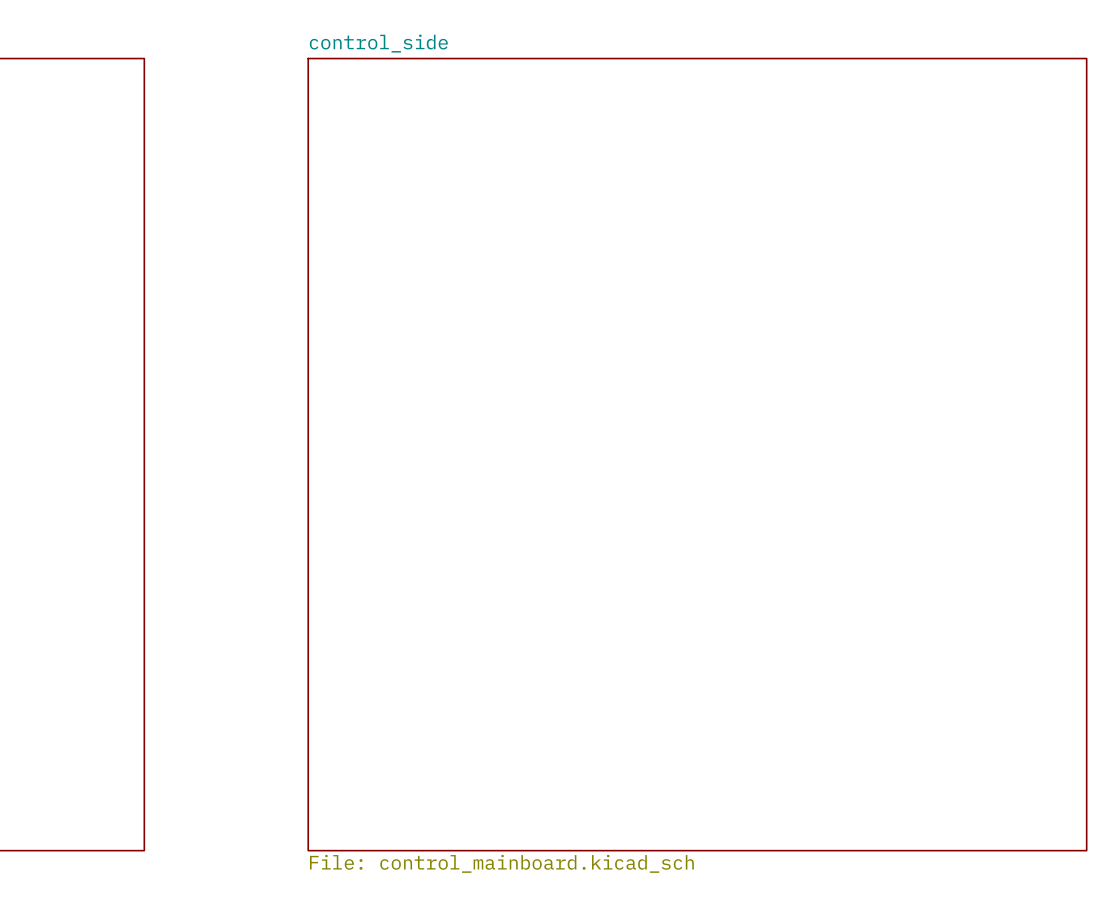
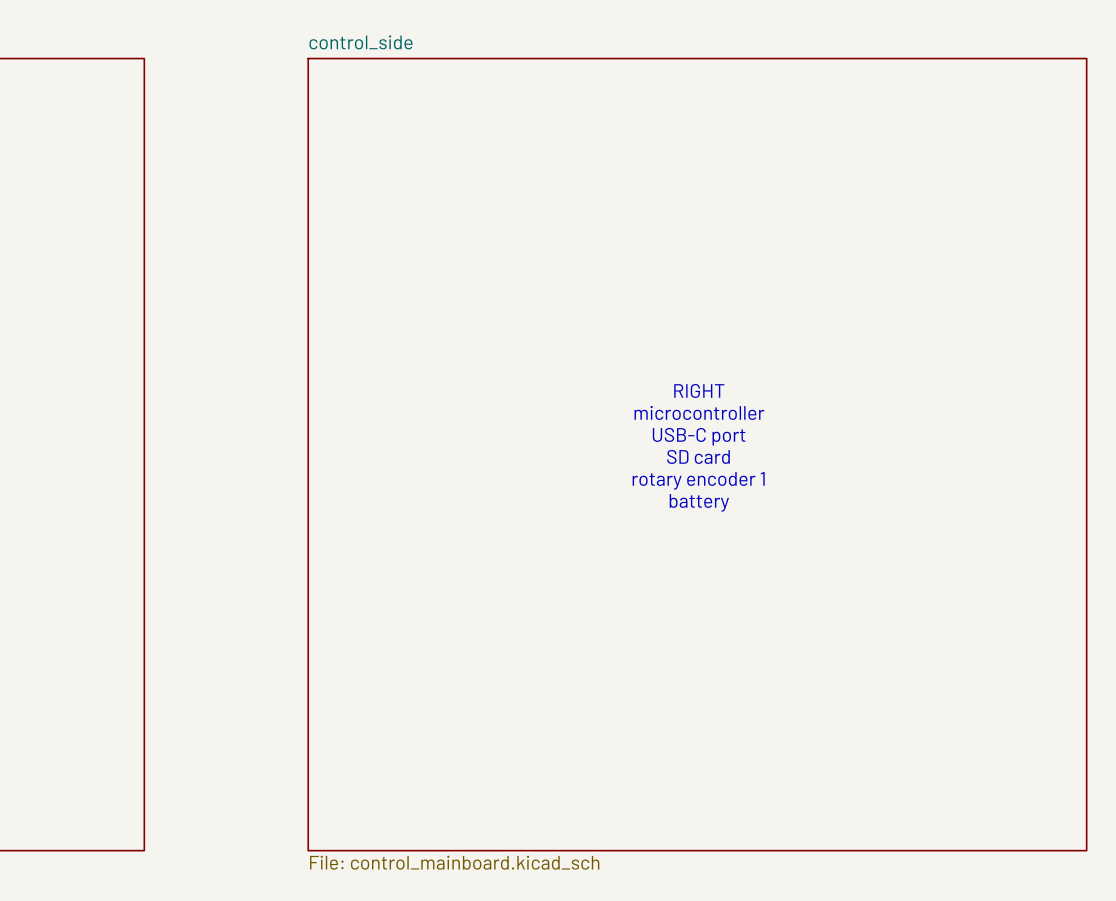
text: none -> RIGHT (699, 390)
text: none -> microcontroller (699, 412)
text: none -> USB-C port (699, 436)
text: none -> SD card (698, 456)
text: none -> rotary encoder 1 (698, 480)
text: none -> battery (699, 502)

